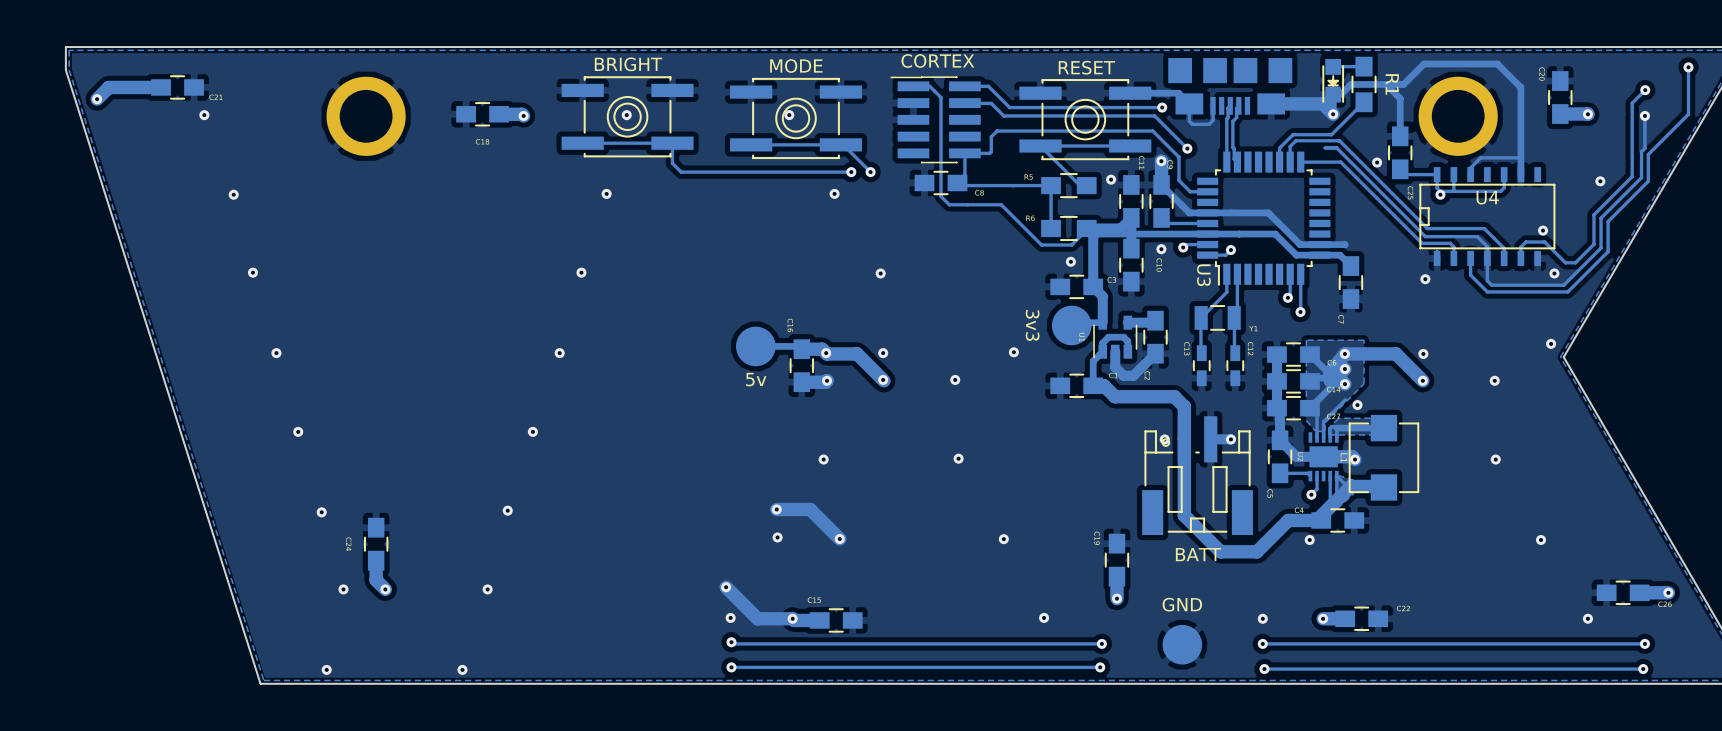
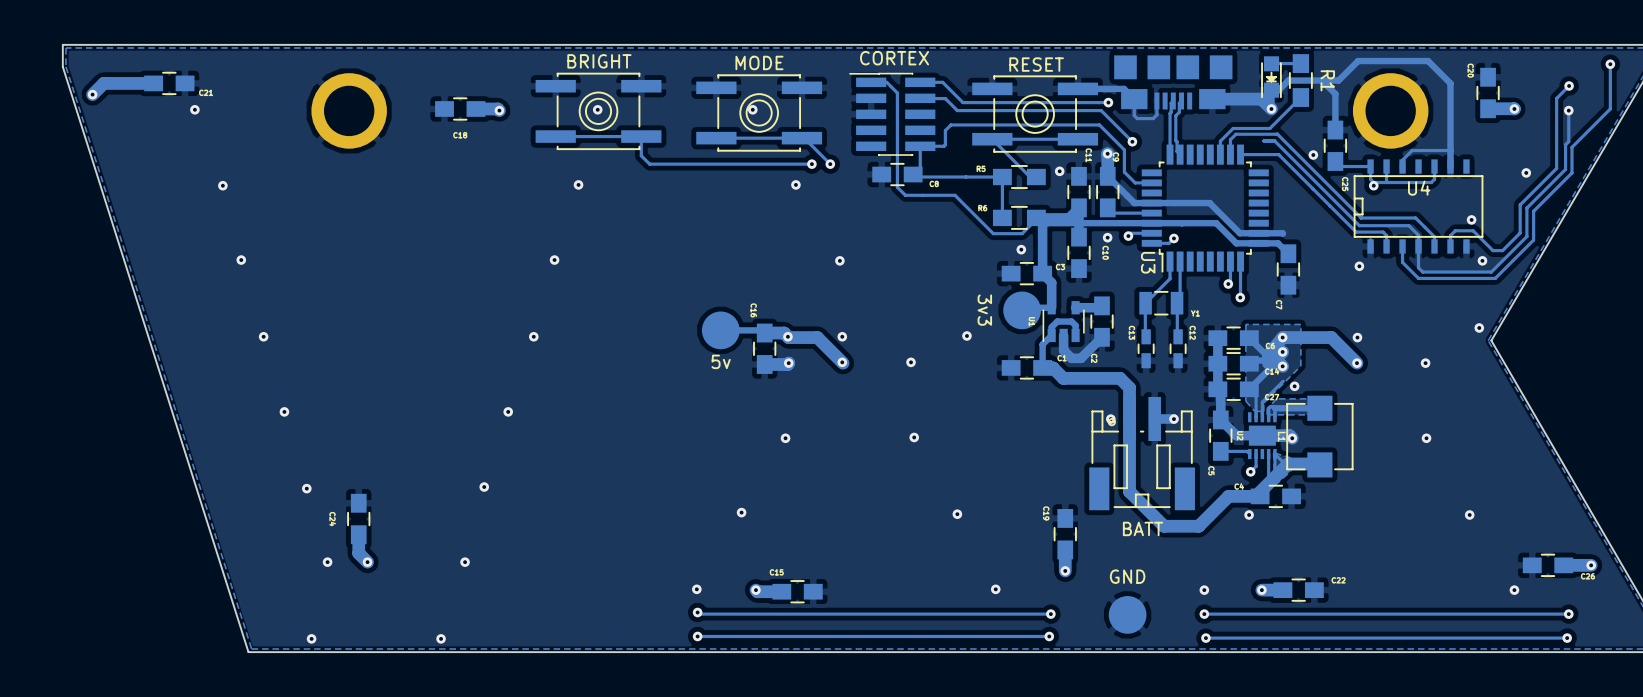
track: (776, 509) (810, 509) (839, 538) -> none
via: (776, 509) -> none
via: (839, 538) -> none
track: (726, 587) (757, 618) (792, 618) -> none
via: (726, 587) -> none

